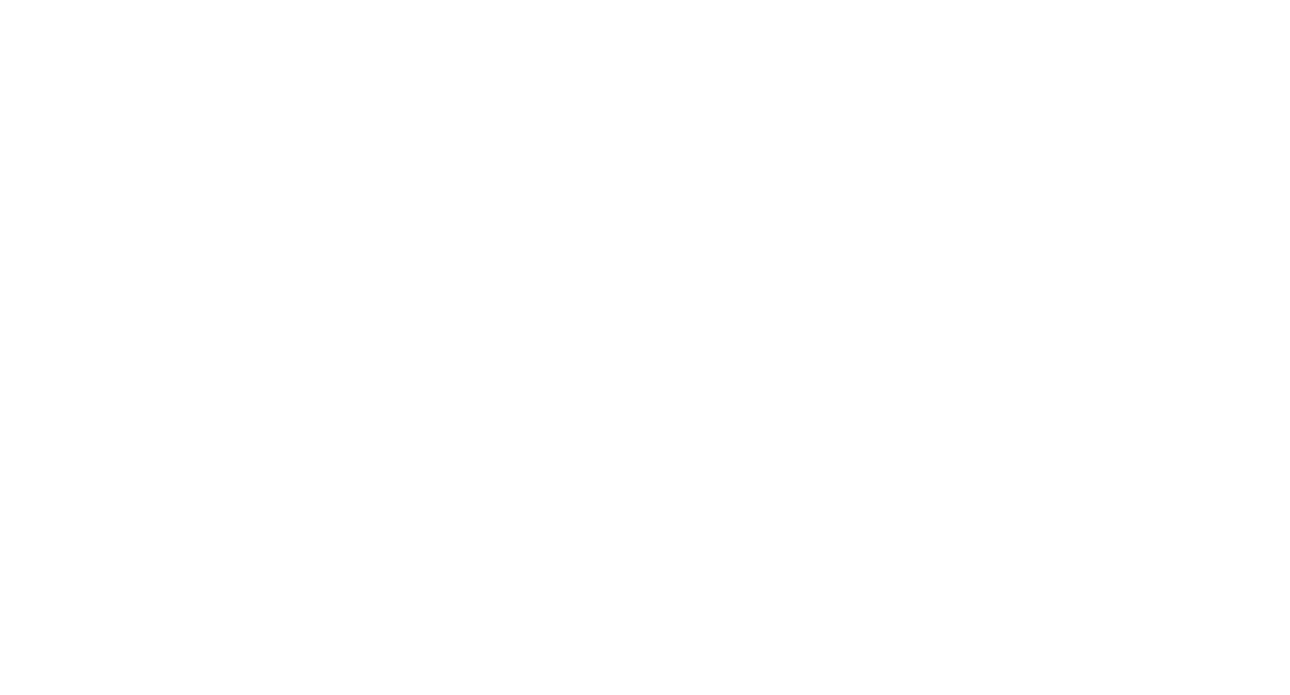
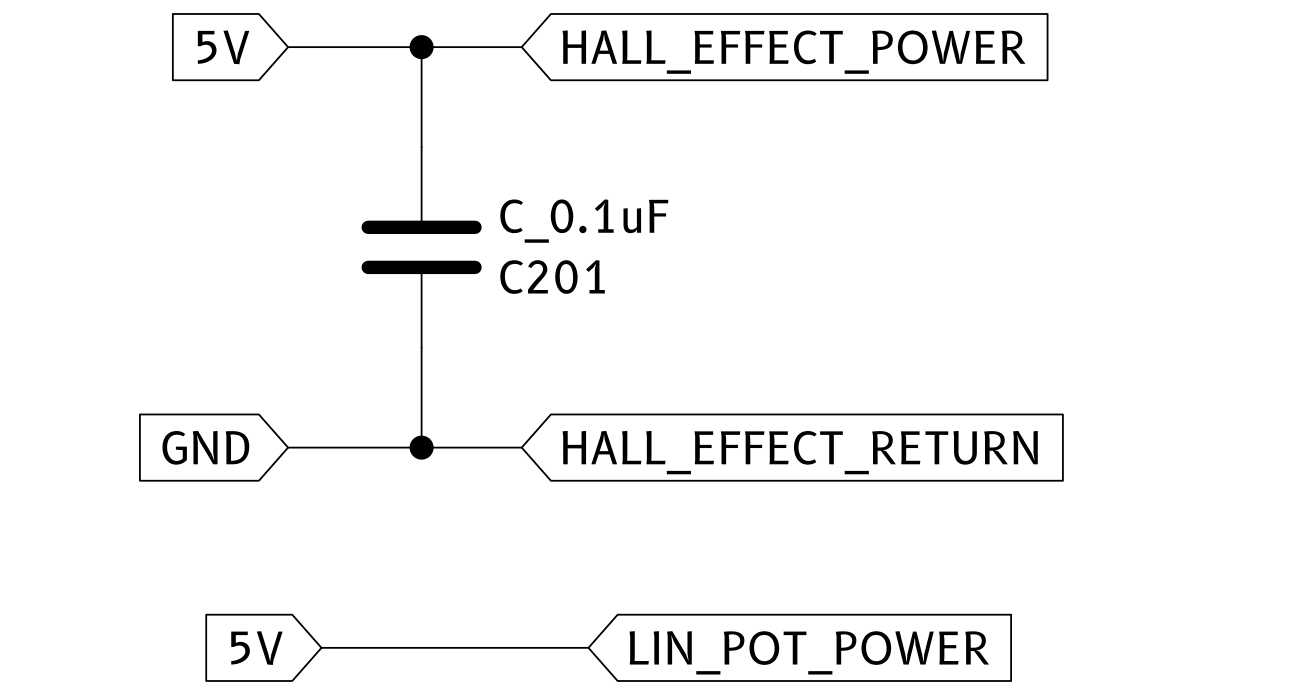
global label: none -> 5V (223, 47)
wire: none -> (288, 47) (521, 47)
wire: none -> (421, 47) (421, 147)
junction: none -> (421, 47)
global label: none -> HALL_EFFECT_POWER (794, 52)
C201: none -> C_0.1uF (421, 247)
wire: none -> (421, 347) (421, 447)
global label: none -> GND (205, 447)
wire: none -> (288, 447) (521, 447)
junction: none -> (421, 447)
global label: none -> HALL_EFFECT_RETURN (800, 452)
wire: none -> (321, 647) (588, 647)
global label: none -> 5V (256, 648)
global label: none -> LIN_POT_POWER (809, 652)

